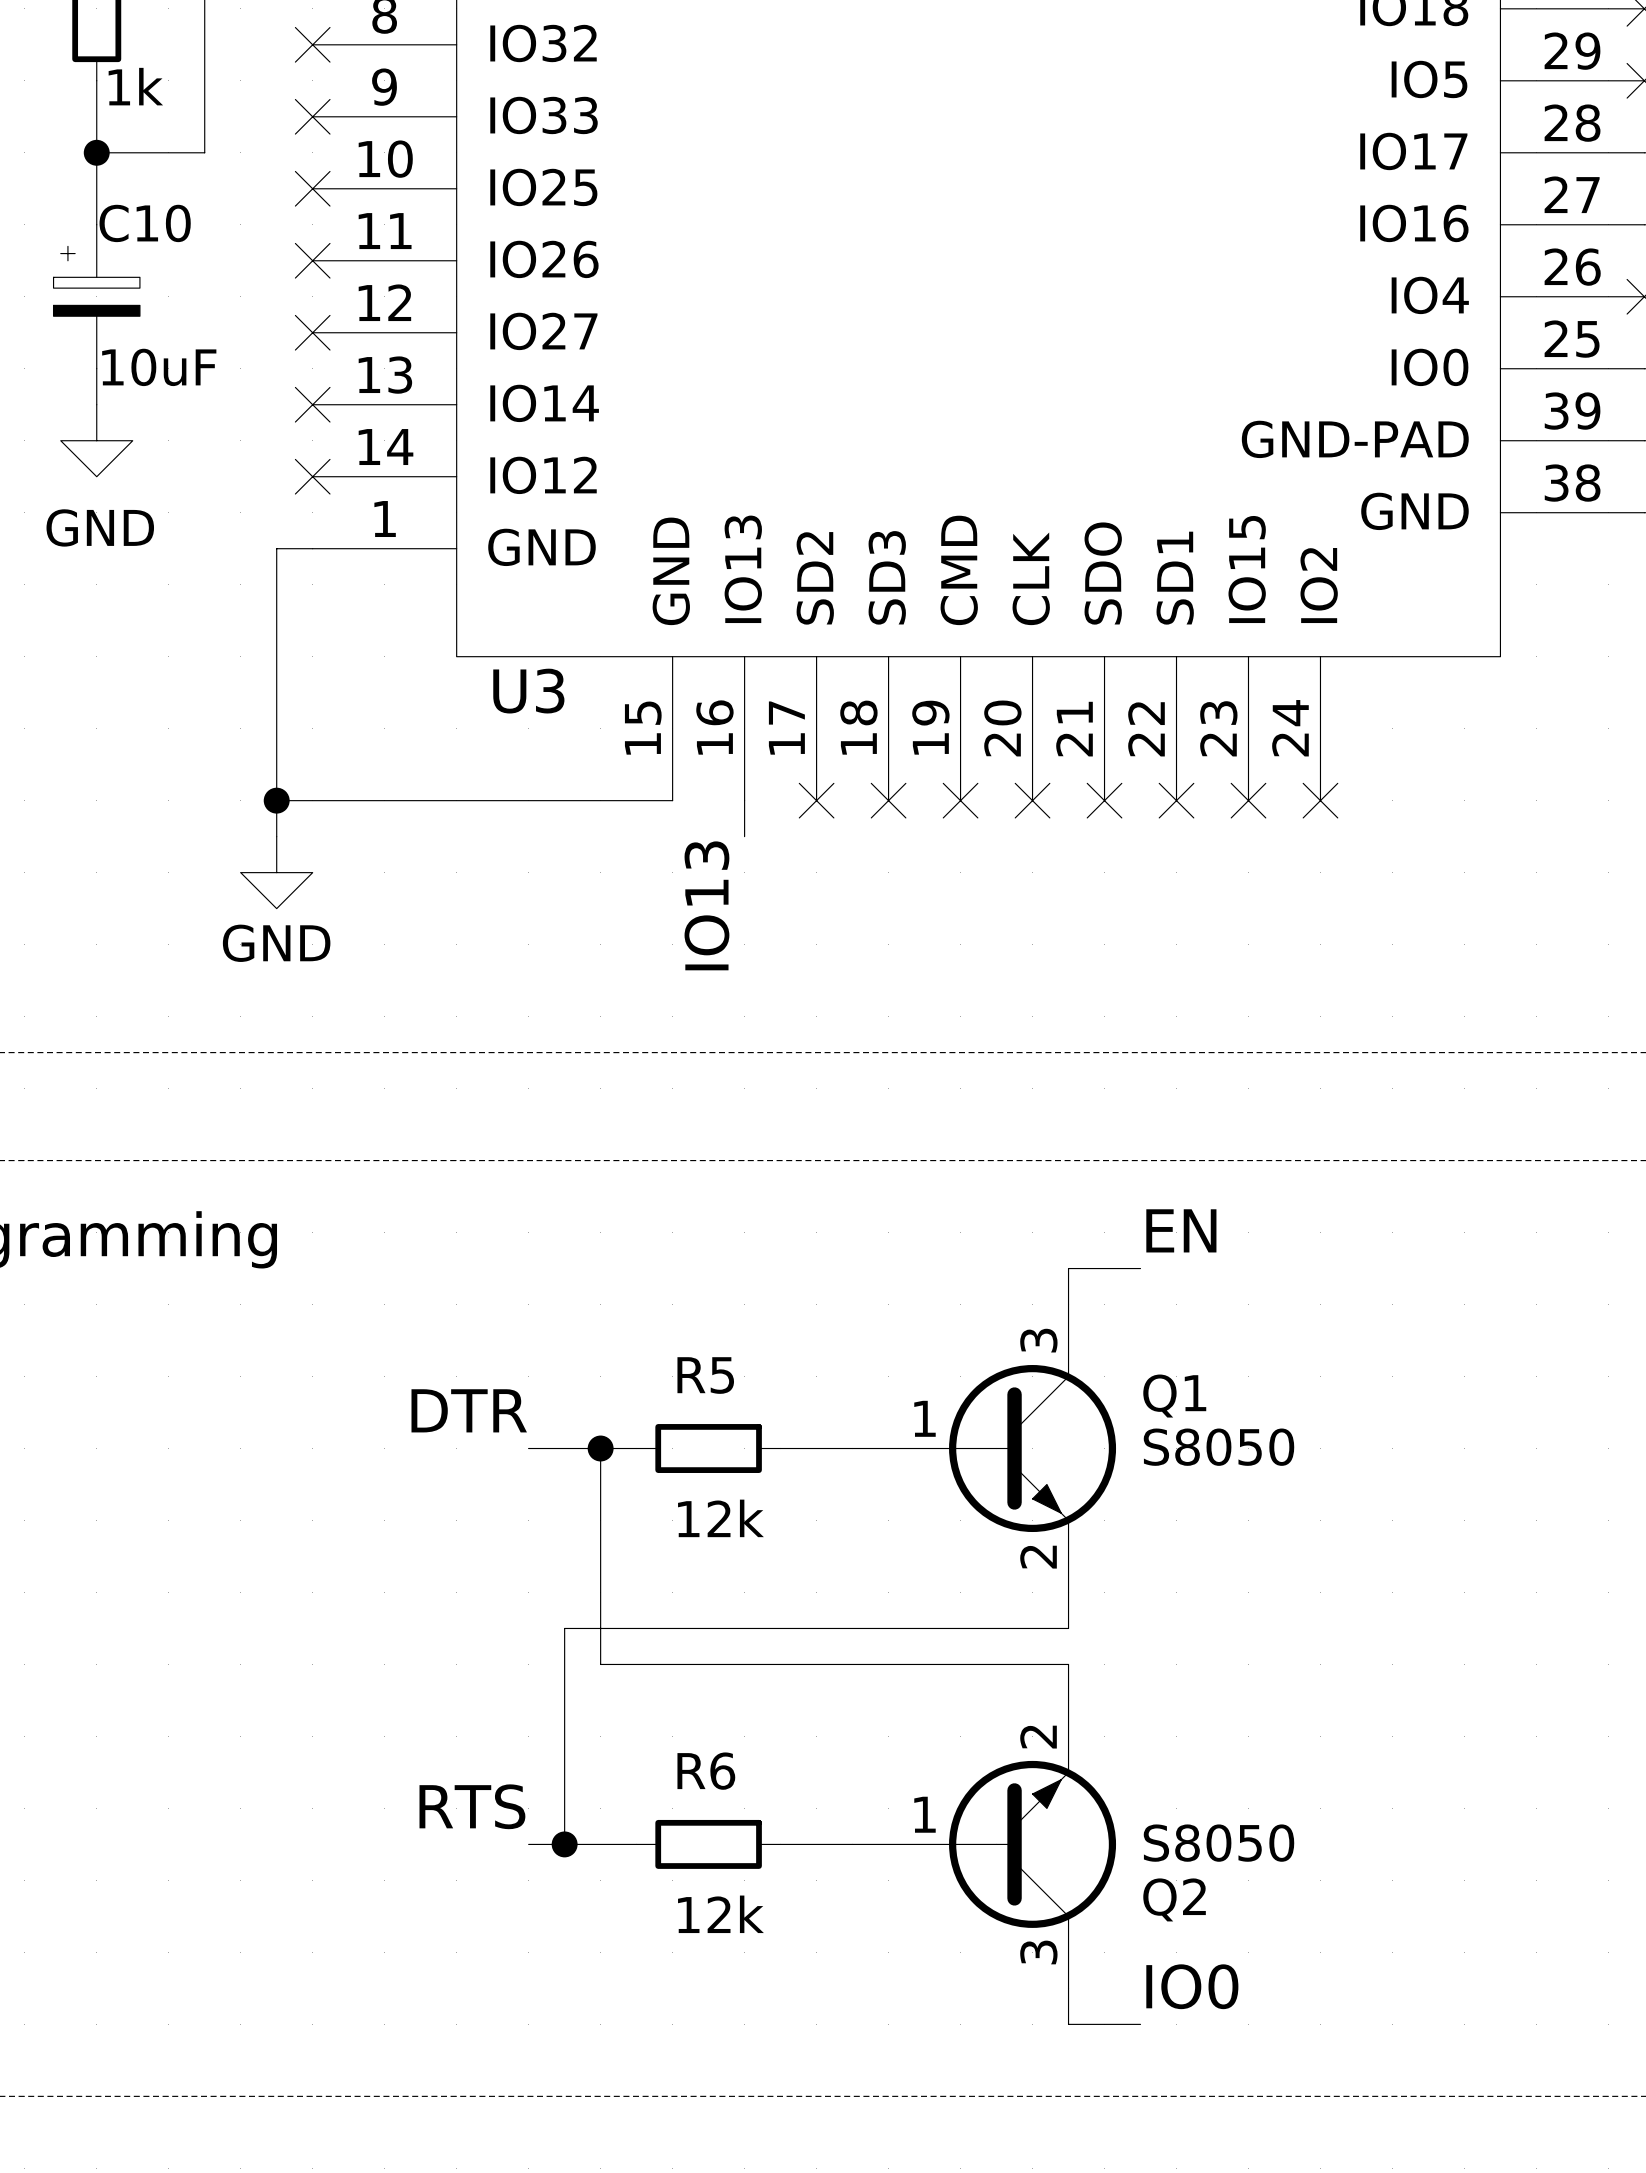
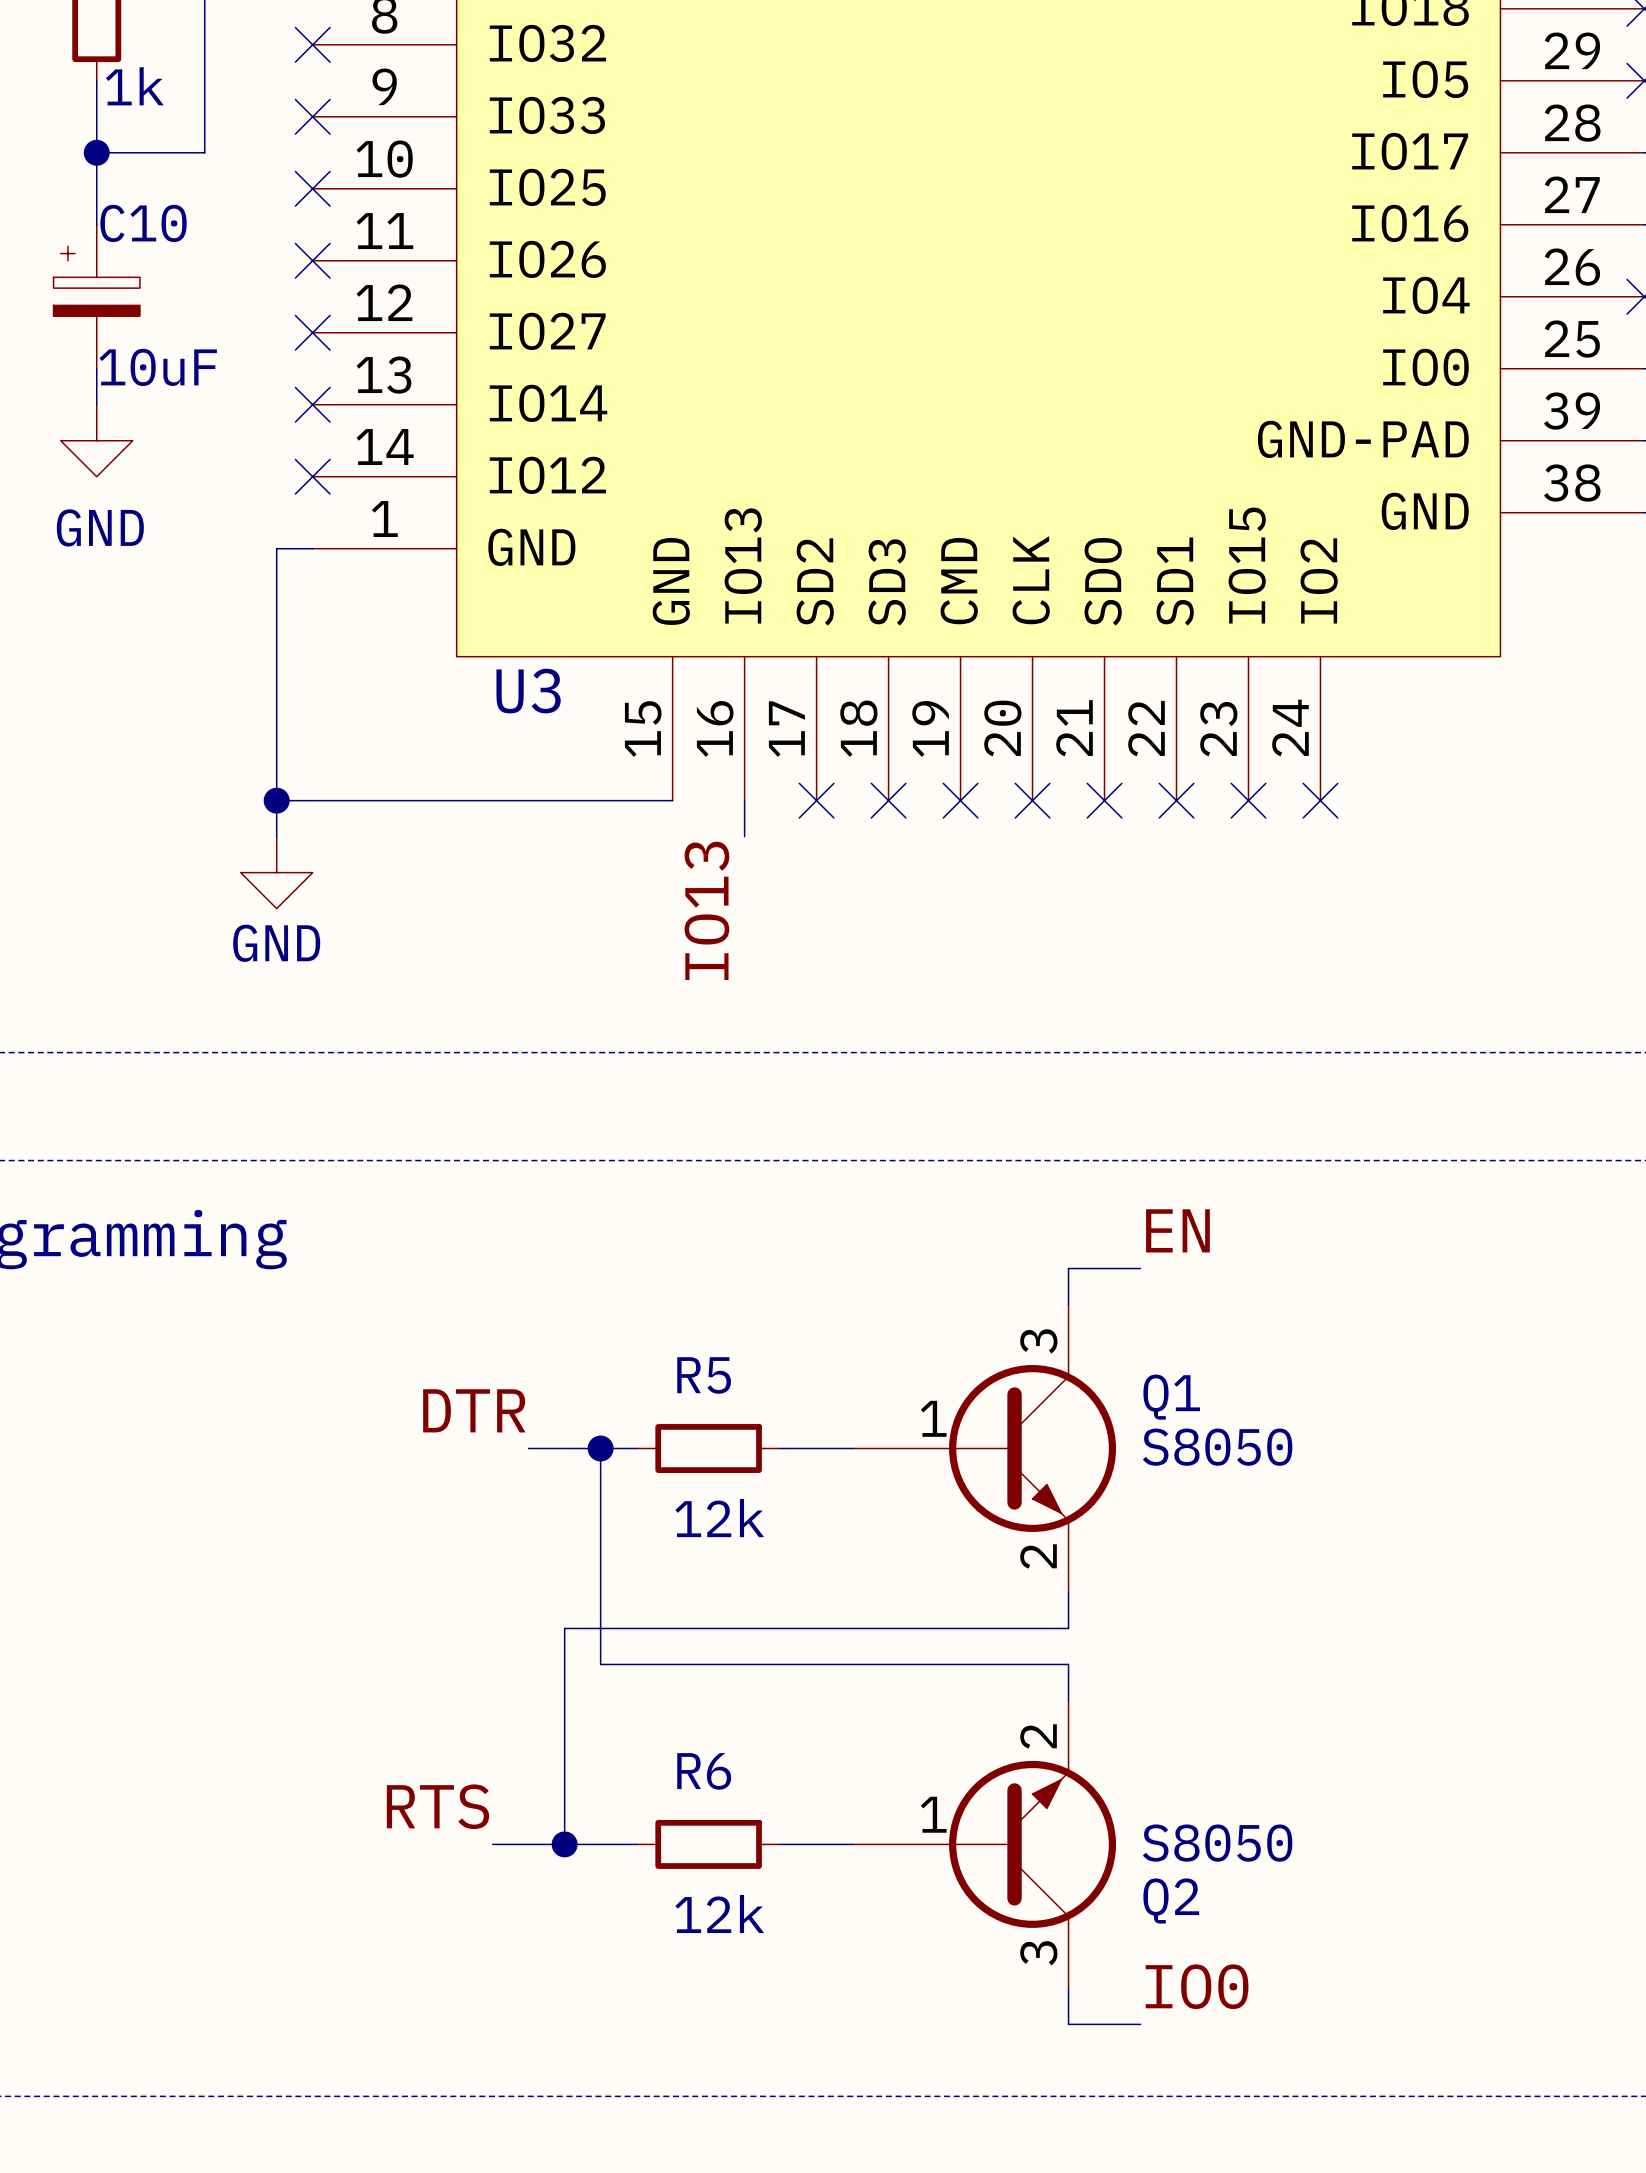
Q1 symbol: [852, 1304, 1117, 1593] -> [852, 1304, 1117, 1593]
Q2 symbol: [852, 1700, 1117, 1989] -> [852, 1700, 1117, 1989]
label position: RTS (472, 1806) -> RTS (437, 1806)
wire: none -> (492, 1844) (528, 1844)

